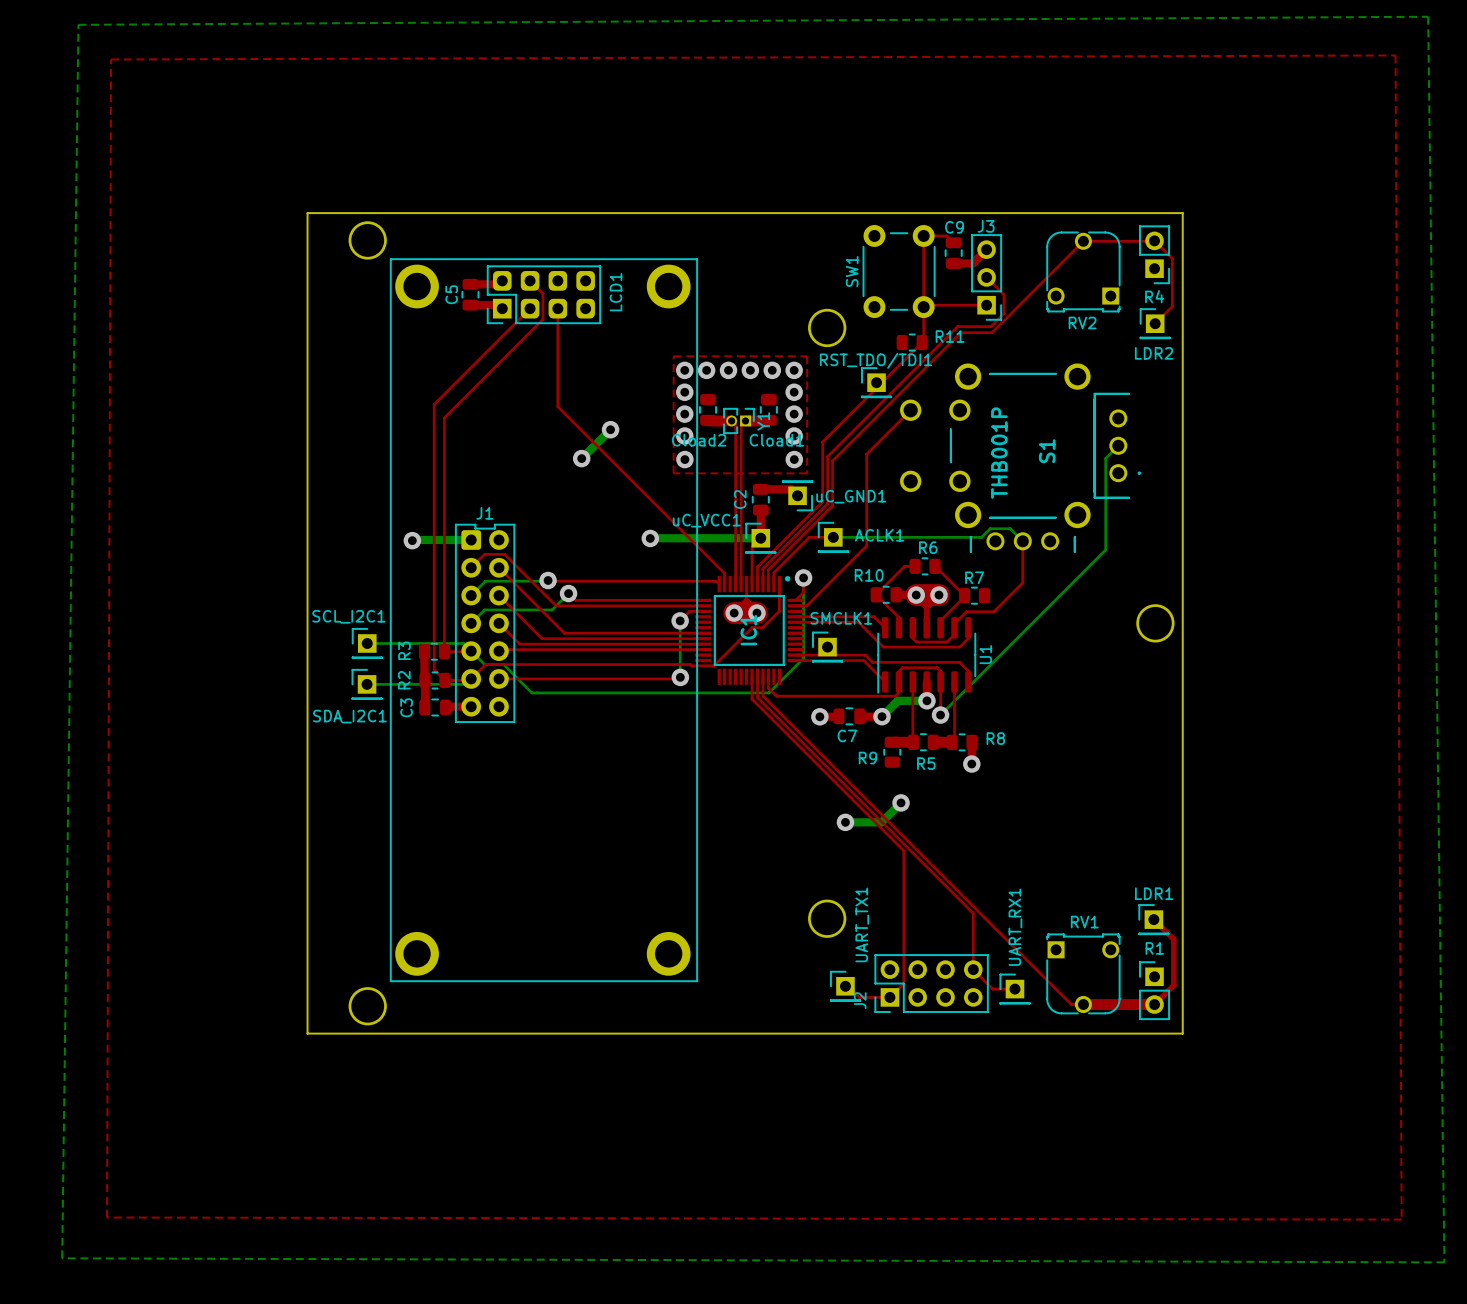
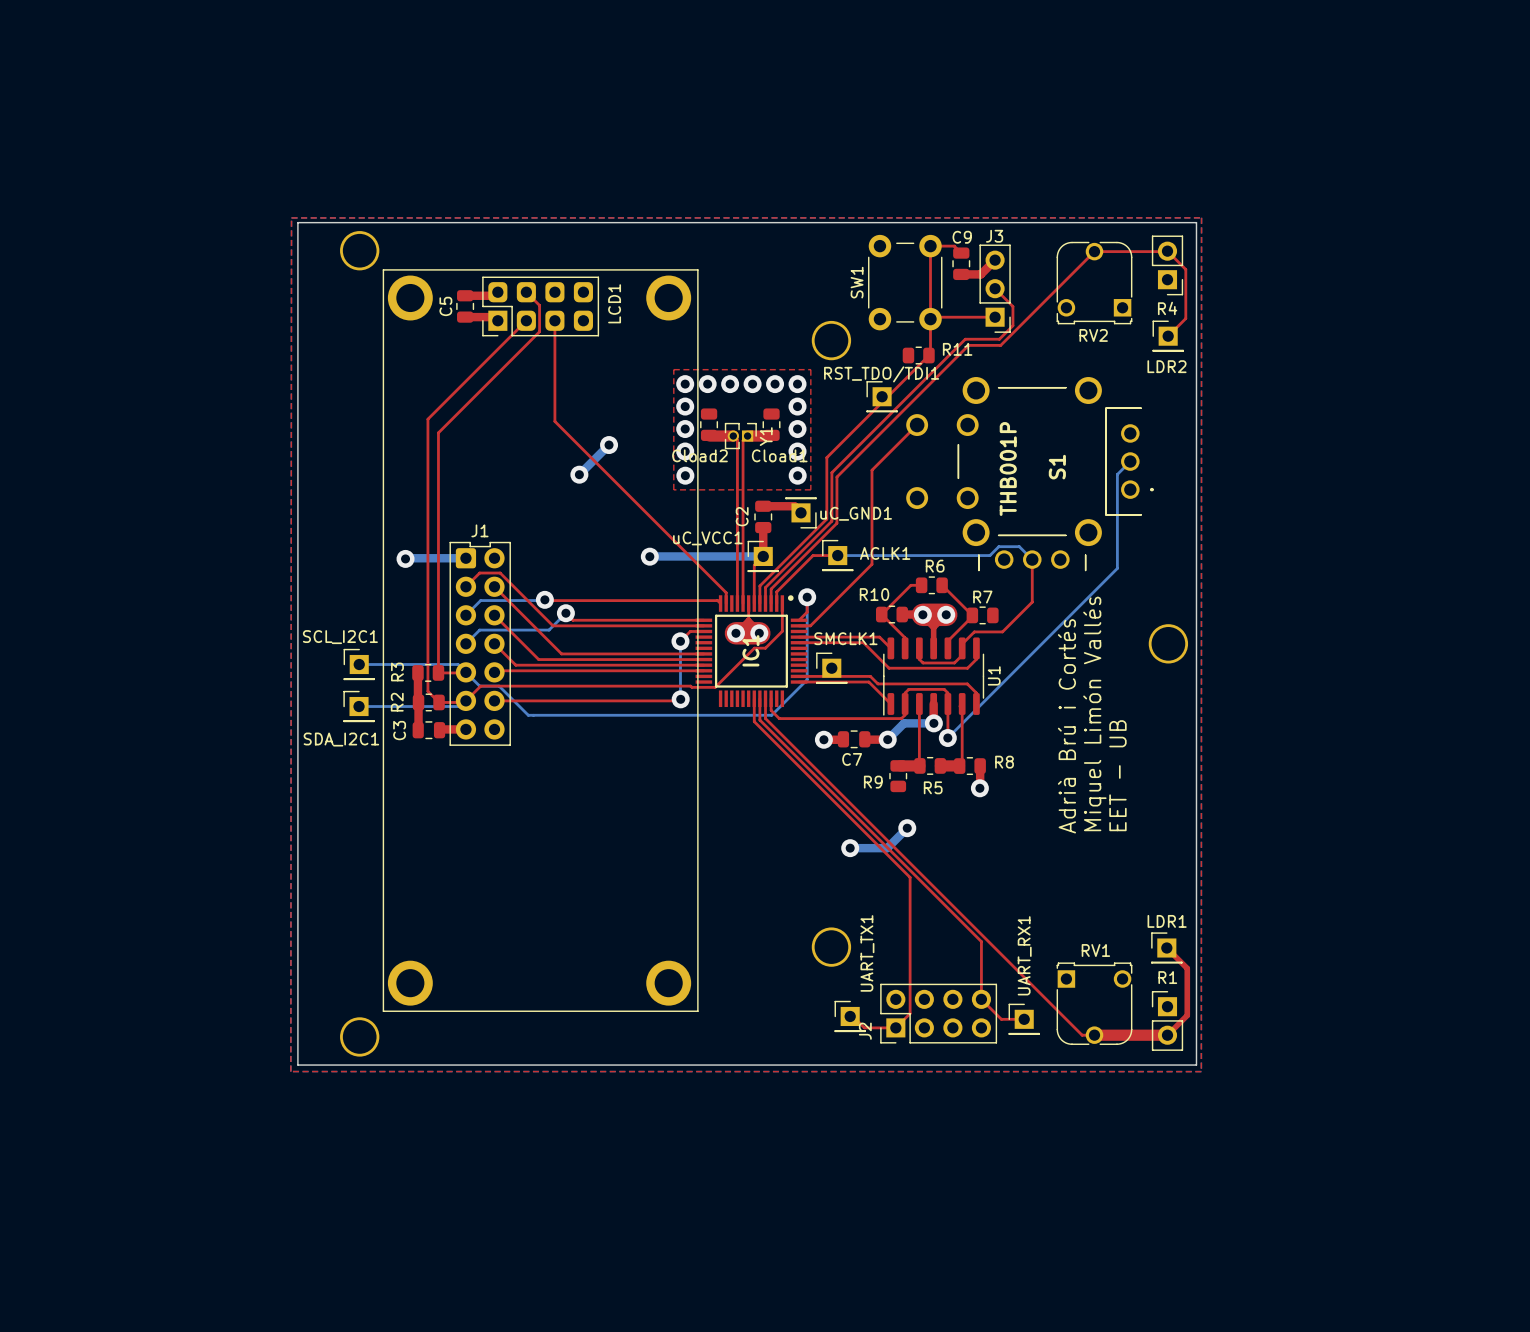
bottom zone outline: (1428, 16) (78, 24) (62, 1258) (1444, 1262) (1428, 16) -> none
top zone outline: (1395, 55) (111, 59) (107, 1217) (1401, 1219) (1395, 55) -> none
top zone outline: none -> (1201, 217) (291, 217) (290, 1071) (1201, 1071) (1201, 217)
text: none -> Miquel Limón Vallés (1094, 713)
text: none -> Adrià Brú i Cortés (1066, 726)
text: none -> EET - UB (1117, 775)

